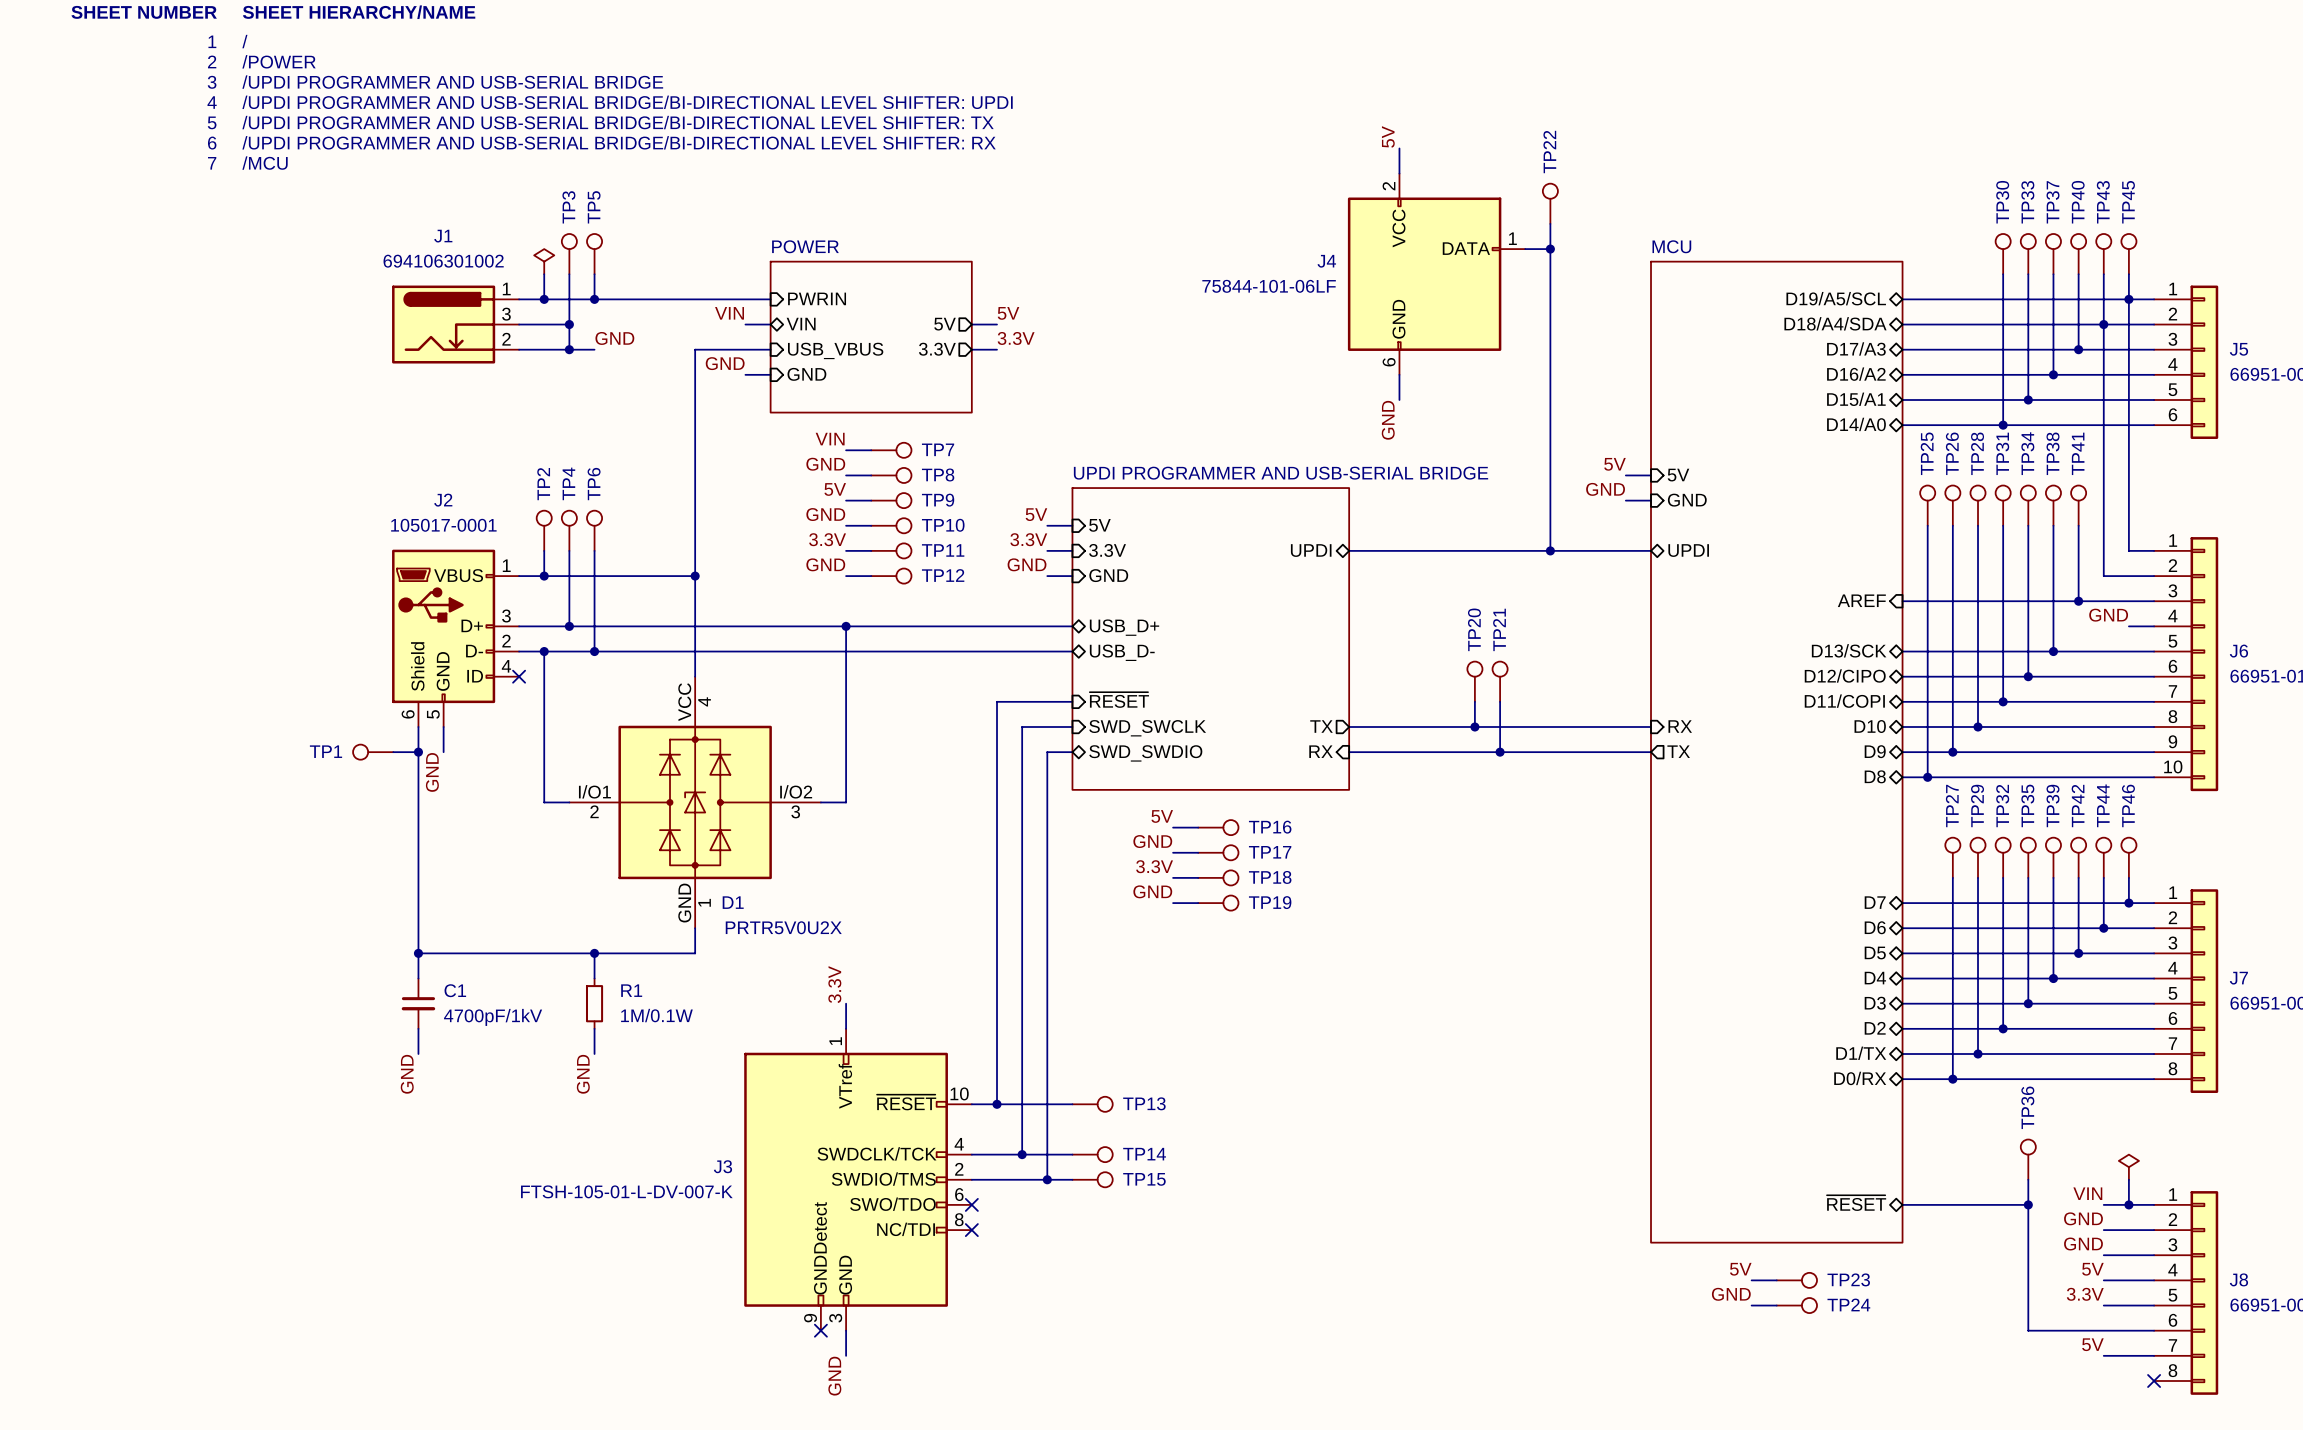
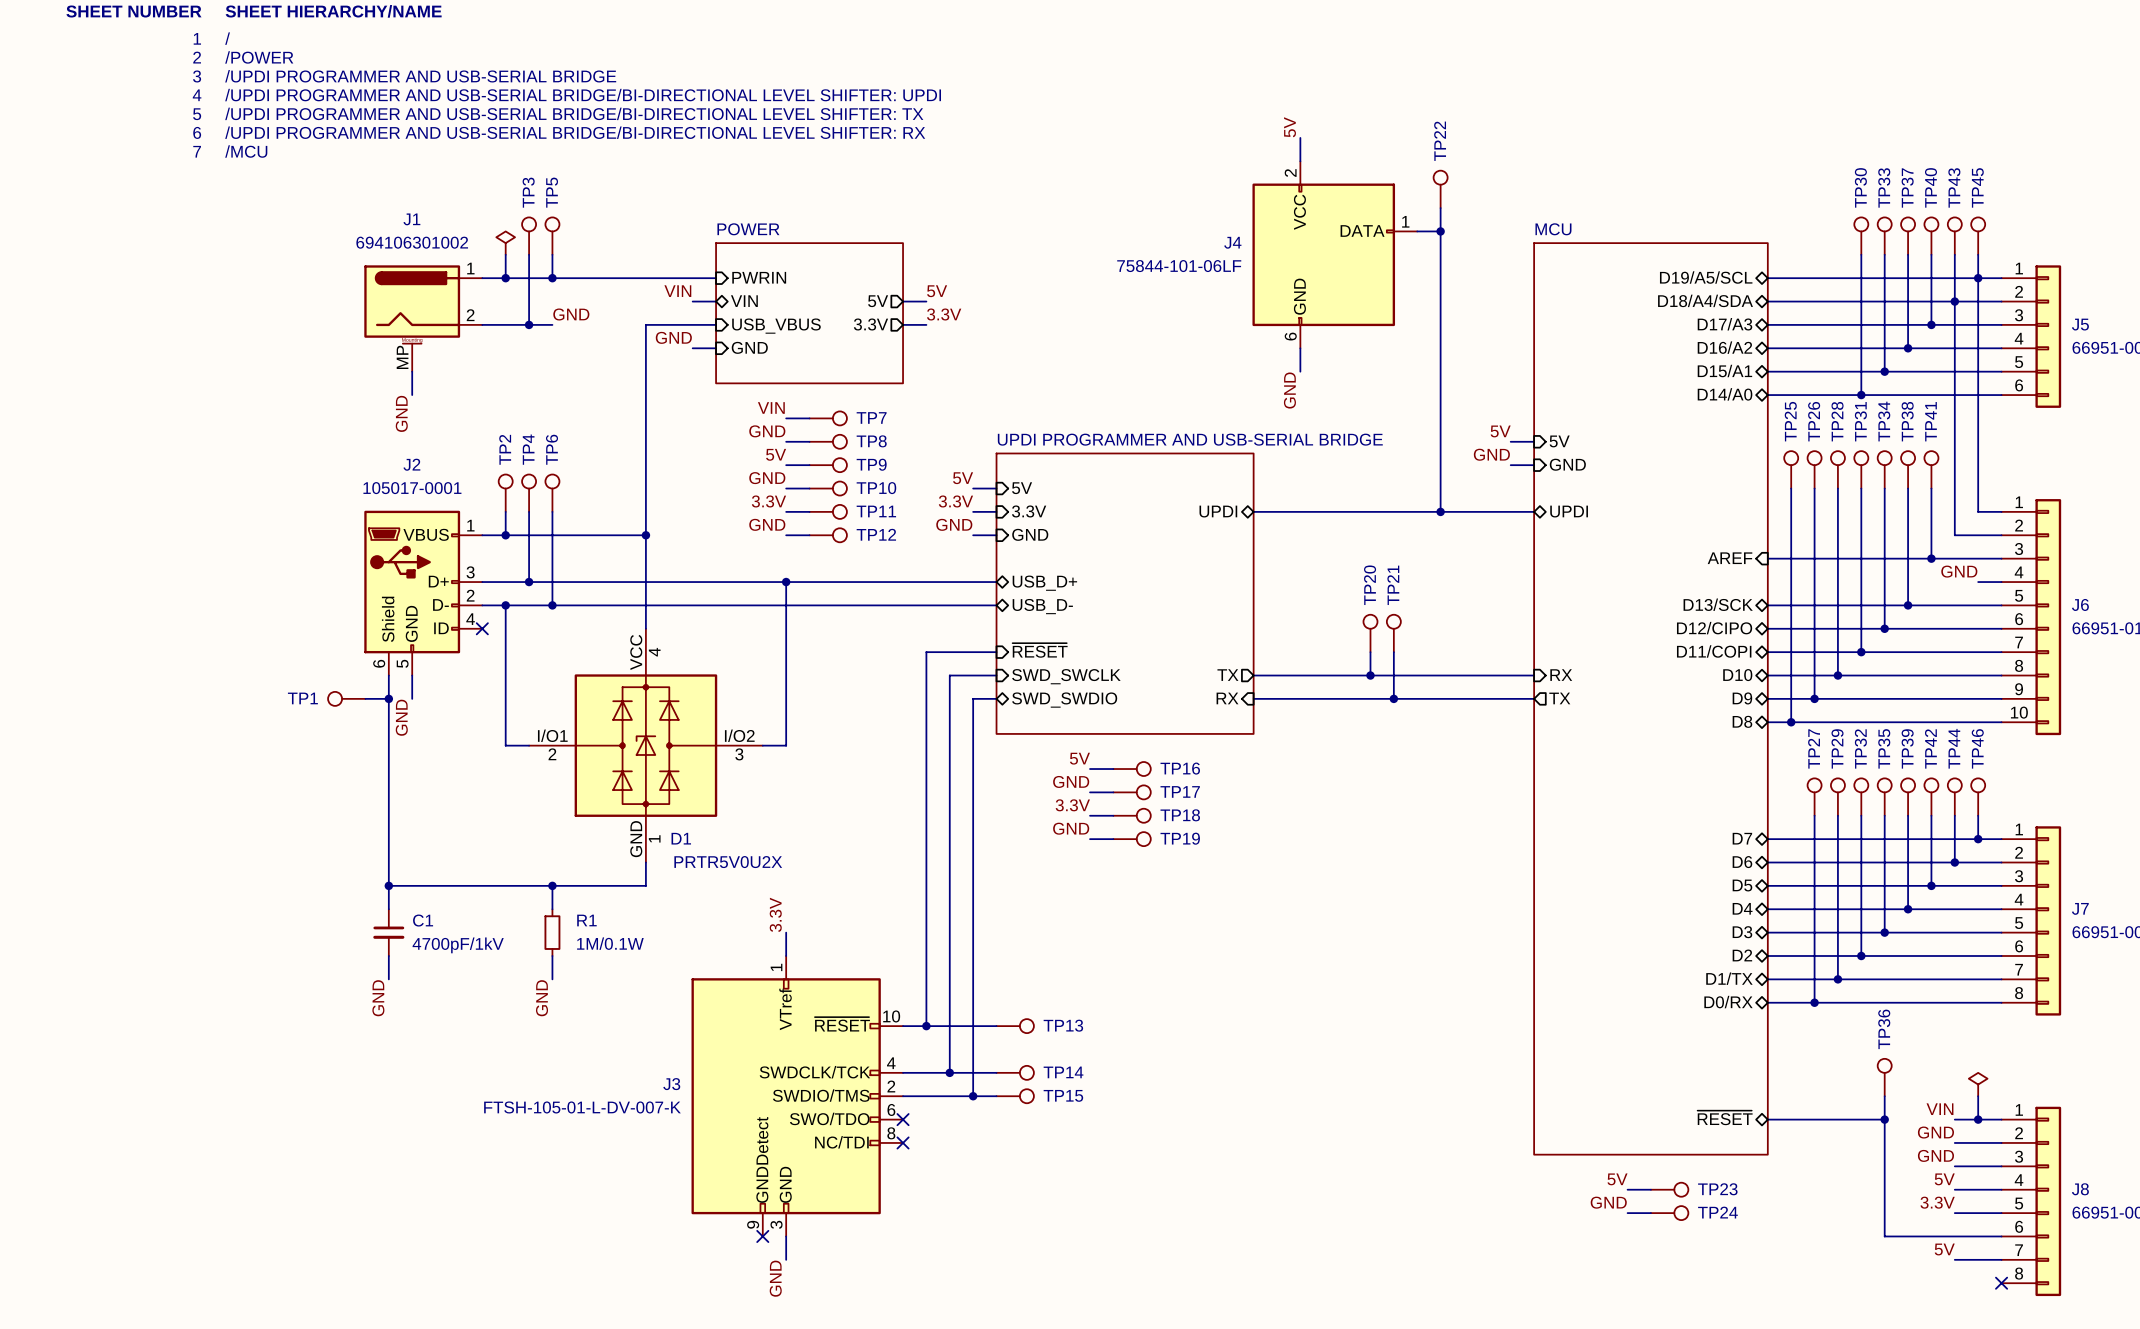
J1 symbol: [392, 285, 520, 364] -> [364, 265, 483, 372]
wire: (519, 324) (569, 324) -> none
junction: (569, 324) -> none
wire: none -> (412, 371) (412, 395)
label: none -> GND (401, 413)

